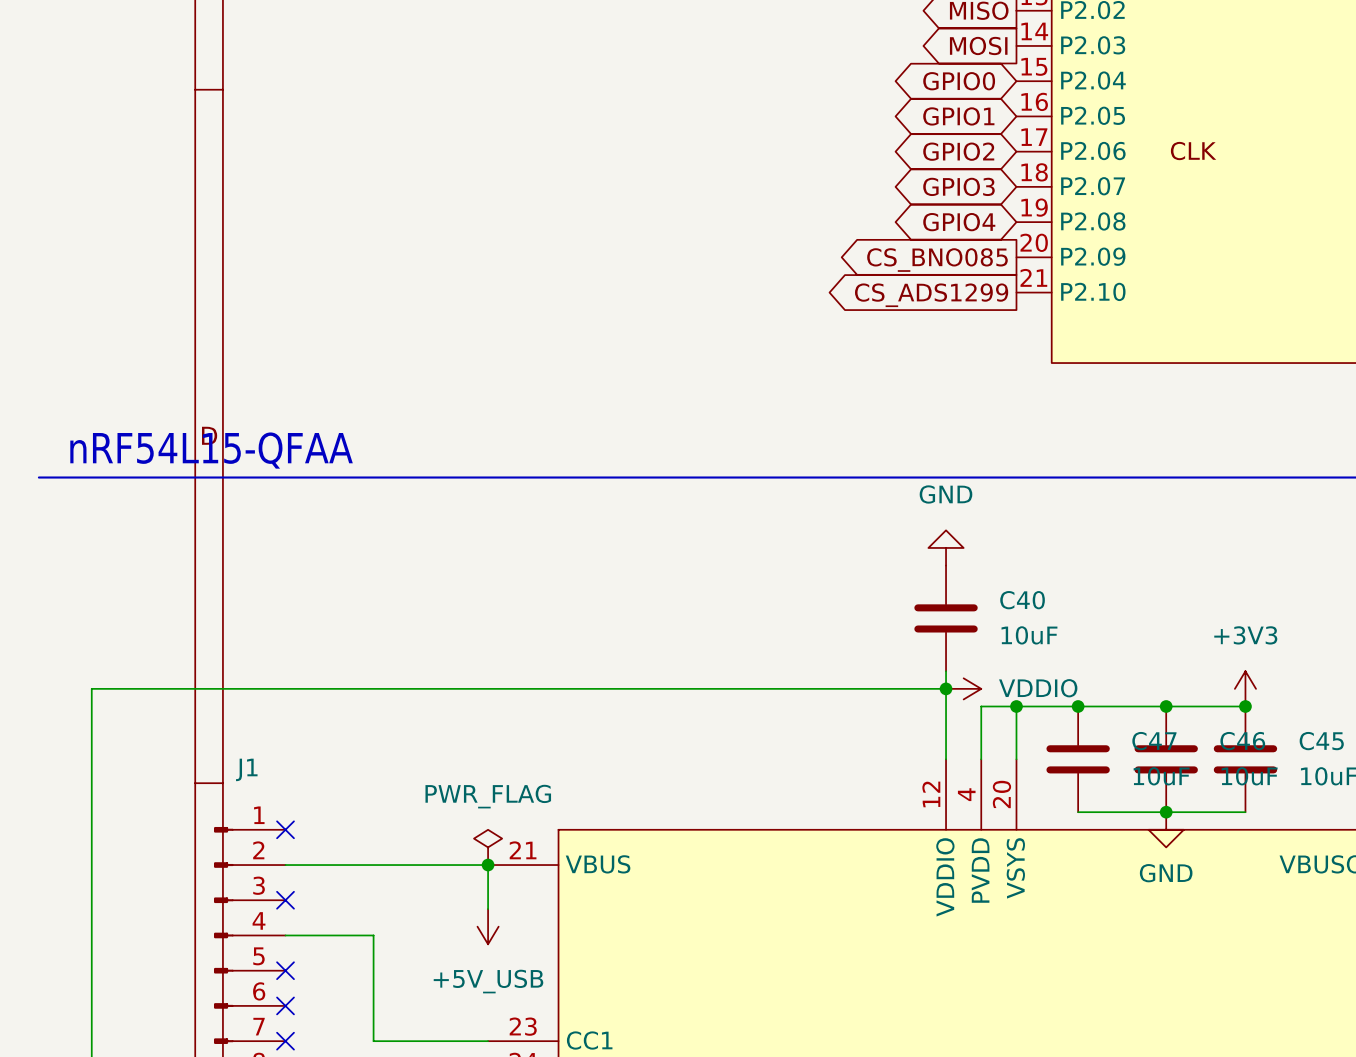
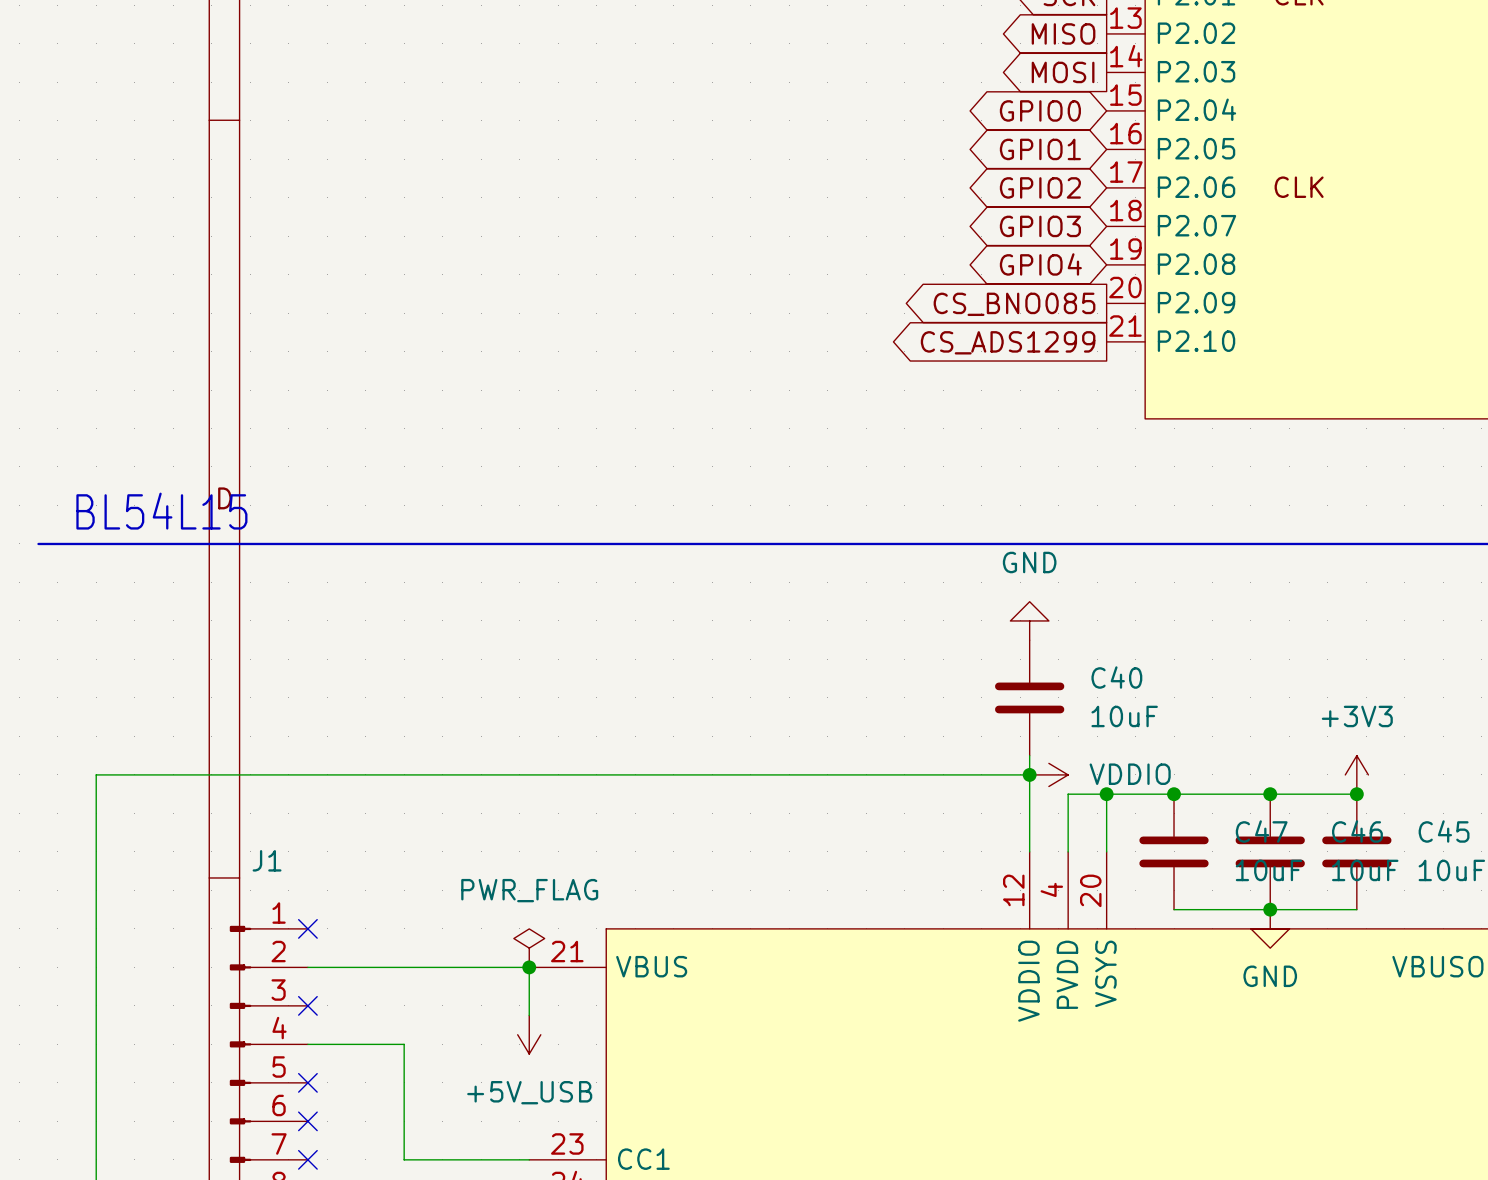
text: nRF54L15-QFAA (211, 450) -> BL54L15 (161, 511)

